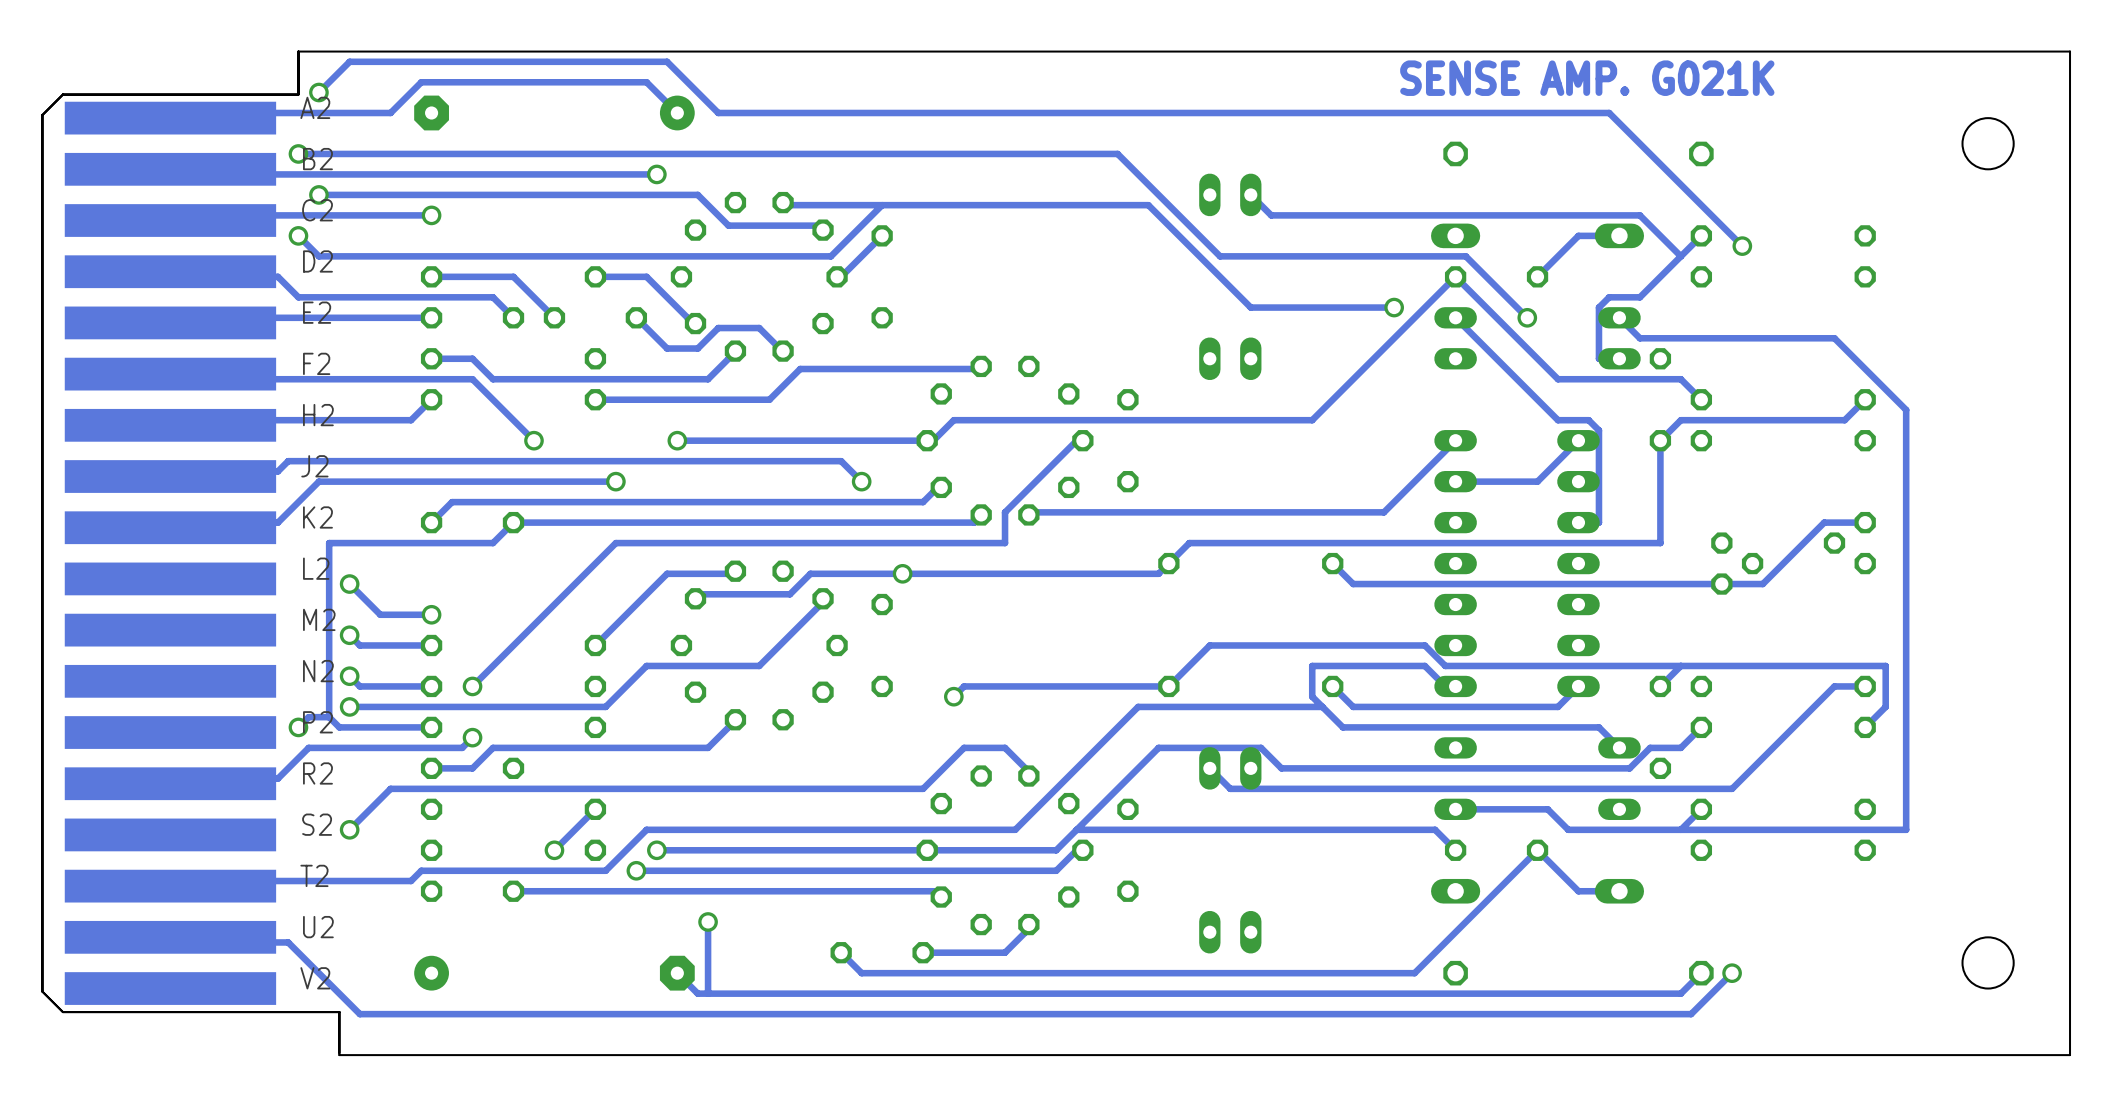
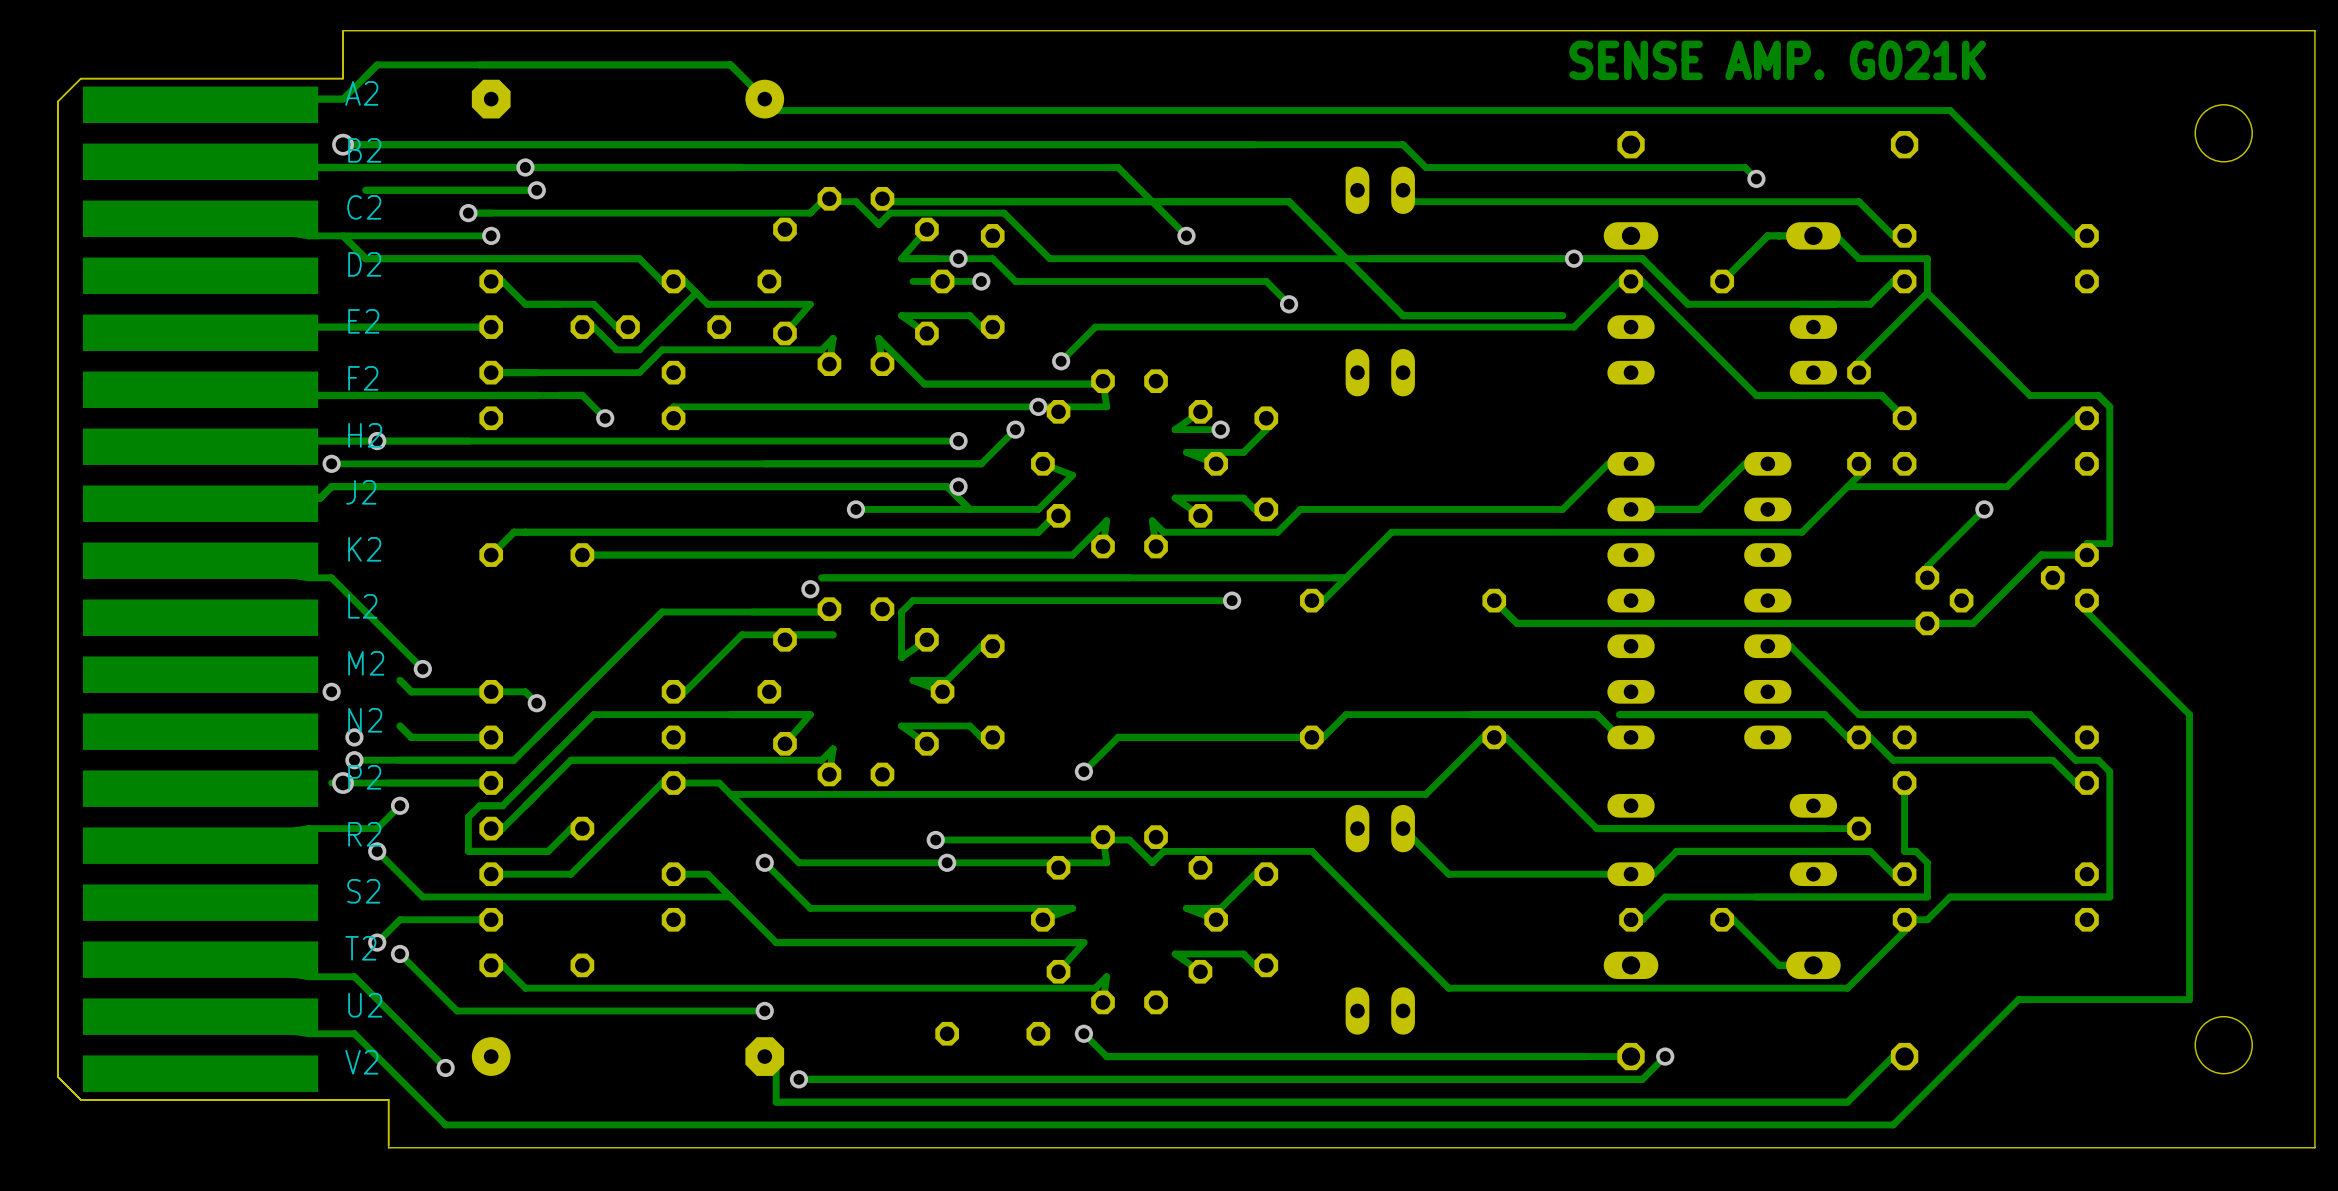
track: (329, 82) (349, 61) (667, 61) (718, 112) (1609, 112) (1742, 246) -> none
track: (421, 82) (390, 112) (298, 112) -> (479, 64) (377, 64)
track: none -> (365, 76) (343, 99)
via: (318, 92) -> none
track: none -> (764, 99) (776, 110) (1950, 110) (2075, 235) (2086, 235)
track: (1117, 153) (1220, 256) -> (1254, 144) (1403, 144) (1425, 167) (1745, 167) (1756, 178)
via: none -> (525, 167)
track: none -> (741, 167) (1118, 167) (1186, 235)
via: (656, 174) -> none
via: none -> (1756, 178)
via: (318, 194) -> none
track: (472, 194) (697, 194) (728, 225) (820, 225) (823, 230) -> (901, 258) (926, 229)
via: none -> (536, 190)
track: (882, 205) (830, 256) -> (1289, 304) (1266, 281) (1015, 281) (992, 258) (935, 258)
track: (1261, 205) (1271, 215) (1639, 215) (1680, 256) -> (1414, 201) (1859, 201) (1893, 235) (1904, 235)
track: (411, 215) (175, 215) (170, 220) -> (491, 235) (308, 235) (200, 218)
via: none -> (468, 213)
track: none -> (491, 213) (810, 213) (821, 201) (855, 201) (878, 224) (890, 213) (1004, 213) (1049, 258) (1368, 258)
via: (431, 215) -> none
via: (298, 235) -> none
via: none -> (491, 235)
track: (882, 235) (841, 276) -> (981, 281) (947, 281)
via: none -> (1186, 235)
track: none -> (1813, 235) (1836, 235) (1859, 258) (1927, 258) (1927, 292)
track: (1701, 235) (1639, 297) -> (1904, 281) (1893, 281) (1870, 304) (1836, 304)
via: (1742, 246) -> none
track: (800, 256) (564, 256) -> (673, 281) (662, 281) (639, 258)
via: none -> (958, 258)
via: none -> (1574, 258)
track: (170, 271) (175, 276) (277, 276) (298, 297) (462, 297) -> none
track: (441, 276) (513, 276) (554, 317) -> (502, 281) (525, 304)
track: (605, 276) (646, 276) (695, 323) -> (684, 281) (707, 304) (810, 304) (784, 333)
track: none -> (942, 281) (912, 281)
via: none -> (981, 281)
track: none -> (696, 292) (639, 349) (616, 349) (593, 327) (582, 327)
track: none -> (1927, 292) (1859, 361) (1859, 372)
track: (493, 297) (513, 317) -> (559, 304) (593, 304) (616, 327) (627, 327)
via: none -> (1289, 304)
track: (1506, 297) (1527, 317) -> (1688, 304) (1802, 304)
track: (1609, 297) (1598, 307) (1598, 358) (1619, 358) -> none
via: (1394, 307) -> none
track: (636, 317) (667, 348) (697, 348) (718, 328) (759, 328) (783, 351) -> (924, 384) (878, 338) (882, 364)
track: none -> (992, 327) (981, 327) (969, 315) (901, 315) (926, 333)
track: (1455, 317) (1558, 420) (1588, 420) (1598, 430) (1598, 522) (1578, 522) -> none
via: (1527, 317) -> none
track: (1619, 317) (1639, 338) (1834, 338) (1875, 379) -> (1927, 292) (2029, 395) (2098, 395)
via: none -> (1061, 361)
track: (735, 351) (708, 379) (513, 379) -> (829, 364) (833, 338) (821, 349) (662, 349) (639, 372) (536, 372)
track: (472, 358) (493, 379) -> (536, 395) (559, 395)
track: (820, 369) (800, 369) (769, 399) (595, 399) -> (1102, 381) (1106, 406) (673, 406) (673, 418)
track: (472, 379) (533, 440) -> none
track: none -> (582, 395) (605, 418)
track: (1568, 379) (1558, 379) (1455, 276) (1312, 420) (953, 420) (933, 440) (871, 440) -> (1756, 395) (1642, 281) (1619, 281) (1574, 327) (1095, 327) (1061, 361)
via: none -> (1038, 406)
track: (1885, 389) (1906, 409) (1906, 829) (1885, 829) -> (2109, 406) (2109, 543) (2086, 543) (2086, 555)
track: none -> (1200, 411) (1175, 429) (1220, 429)
track: (431, 399) (411, 420) -> (958, 441) (468, 441)
via: none -> (605, 418)
track: none -> (1266, 418) (1266, 429) (1243, 452) (1186, 452) (1216, 463)
track: (1865, 399) (1844, 420) (1680, 420) (1660, 440) -> (2086, 418) (2075, 418) (2007, 486) (1847, 486)
track: none -> (1015, 429) (981, 463)
via: none -> (1015, 429)
via: none -> (1220, 429)
via: none -> (377, 441)
via: none -> (958, 441)
via: none -> (331, 463)
via: (533, 440) -> none
track: none -> (764, 463) (331, 463)
via: (677, 440) -> none
track: none -> (1042, 463) (1072, 475) (1038, 509) (855, 509)
track: (1082, 440) (1076, 440) (1005, 512) (1005, 543) -> (1334, 577) (1129, 577)
track: (1455, 440) (1383, 512) (1035, 512) (1028, 514) -> (1631, 463) (1608, 463) (1562, 509) (1300, 509) (1277, 532) (1163, 532) (1152, 520) (1156, 546)
track: (1578, 440) (1537, 481) (1517, 481) -> (1767, 463) (1745, 463) (1699, 509)
track: (1660, 450) (1660, 543) (1199, 543) -> (1859, 475) (1802, 532) (1391, 532) (1323, 600) (1311, 600)
via: none -> (958, 486)
track: (615, 481) (318, 481) (277, 522) (175, 522) (170, 527) -> (422, 669) (331, 577) (308, 577) (200, 560)
via: (615, 481) -> none
via: none -> (855, 509)
via: (861, 481) -> none
track: none -> (1266, 509) (1254, 509) (1243, 498) (1175, 498) (1200, 515)
track: none -> (1984, 509) (1927, 566) (1927, 577)
via: none -> (1984, 509)
track: (981, 514) (974, 522) (953, 522) -> (1102, 546) (1106, 520) (1072, 555)
track: (513, 522) (493, 543) (329, 543) (329, 717) -> none
track: (728, 543) (615, 543) (585, 573) -> (753, 612) (662, 612)
track: (1189, 543) (1158, 573) (810, 573) (789, 594) (738, 594) -> none
via: none -> (810, 589)
track: none -> (1232, 600) (912, 600) (901, 612) (901, 657) (926, 639)
via: none -> (1232, 600)
track: (667, 573) (595, 645) -> (787, 634) (741, 634) (684, 691) (673, 691)
via: (902, 573) -> none
track: (349, 584) (380, 614) (431, 614) -> none
via: (349, 584) -> none
track: (823, 598) (820, 604) (759, 665) (718, 665) -> (784, 743) (810, 714)
track: none -> (992, 646) (981, 646) (947, 680) (912, 680) (942, 691)
via: (431, 614) -> none
via: none -> (422, 669)
via: (349, 635) -> none
via: none -> (331, 691)
track: none -> (491, 691) (525, 691) (536, 703)
via: none -> (536, 703)
track: (646, 665) (605, 706) -> (829, 774) (833, 748) (821, 760) (684, 760)
track: none -> (730, 714) (593, 714) (502, 805)
track: (1312, 665) (1312, 696) (1342, 727) (1598, 727) (1619, 747) -> none
track: (1445, 665) (1424, 645) (1209, 645) (1168, 686) -> (1471, 714) (1346, 714) (1323, 737) (1311, 737)
track: none -> (1824, 714) (1847, 737) (1870, 737) (1893, 760) (2052, 760) (2075, 783) (2086, 783)
track: (1660, 665) (1629, 665) -> (1859, 714) (1790, 646) (1767, 646)
track: (1680, 665) (1660, 686) -> none
track: (1814, 665) (1885, 665) (1885, 706) (1865, 727) -> (2029, 714) (2075, 760) (2098, 760) (2109, 771) (2109, 896)
via: (349, 676) -> none
via: none -> (354, 737)
track: none -> (536, 737) (514, 760)
via: (472, 686) -> none
track: none -> (992, 737) (981, 737) (969, 726) (901, 726) (926, 743)
track: (994, 686) (964, 686) (953, 696) -> (1118, 737) (1083, 771)
track: (1578, 686) (1558, 706) (1353, 706) (1332, 686) -> none
track: (1865, 686) (1834, 686) (1732, 788) (1711, 788) -> none
via: (953, 696) -> none
via: none -> (354, 760)
track: none -> (400, 760) (354, 760)
via: (349, 706) -> none
track: (503, 706) (452, 706) -> (570, 760) (536, 794)
track: (1322, 706) (1138, 706) (1015, 829) (646, 829) (605, 870) (421, 870) (411, 881) (175, 881) (170, 886) -> (445, 1067) (354, 976) (308, 976) (200, 959)
track: (329, 717) (339, 727) -> (331, 783) (388, 783)
track: (329, 717) (308, 717) (298, 727) -> none
via: none -> (1083, 771)
track: (735, 719) (708, 747) (493, 747) (472, 768) (441, 768) -> none
track: (1701, 727) (1680, 747) (1650, 747) (1629, 768) -> (1859, 828) (1824, 828)
track: none -> (1904, 783) (1904, 851)
via: (472, 737) -> none
via: none -> (400, 805)
track: (421, 747) (308, 747) (277, 778) (175, 778) (170, 783) -> (400, 805) (377, 828) (308, 828) (200, 845)
track: (462, 747) (441, 747) -> (525, 805) (502, 828)
track: (1209, 768) (1230, 788) (1496, 788) -> (1653, 874) (1676, 851)
track: none -> (1403, 828) (1448, 874) (1631, 874)
track: (1424, 768) (1281, 768) (1261, 747) (1158, 747) (1056, 850) (656, 850) -> (1596, 828) (1505, 737) (1482, 737) (1425, 794) (730, 794)
track: none -> (1102, 837) (1106, 862) (798, 862) (719, 783) (662, 783) (570, 874) (491, 874)
track: (1028, 776) (1025, 768) (1005, 747) (964, 747) (923, 788) (482, 788) -> (582, 828) (570, 828) (548, 851)
track: none -> (935, 839) (1129, 839) (1152, 862) (1163, 851) (1311, 851) (1448, 988) (1847, 988) (1904, 931) (1904, 919) (1927, 919) (1950, 896)
via: none -> (935, 839)
track: none -> (377, 851) (422, 896) (730, 896)
via: none -> (377, 851)
track: (411, 788) (390, 788) (349, 829) -> (468, 851) (468, 817) (479, 805)
track: (1701, 788) (1670, 788) -> (1904, 874) (1893, 874) (1870, 851)
track: none -> (764, 862) (810, 908) (1072, 908) (1042, 919)
via: none -> (764, 862)
via: none -> (947, 862)
track: (595, 809) (554, 850) -> none
track: none -> (1266, 874) (1254, 874) (1220, 908) (1186, 908) (1216, 919)
track: (1476, 809) (1547, 809) (1568, 829) -> (1631, 919) (1642, 919) (1665, 896) (1756, 896)
track: (1701, 809) (1680, 829) -> none
via: (349, 829) -> none
track: (1076, 829) (1435, 829) (1455, 850) -> none
track: (1742, 829) (1721, 829) -> (1915, 851) (1927, 862) (1927, 896)
track: none -> (491, 919) (400, 919) (377, 942)
via: (554, 850) -> none
via: (656, 850) -> none
track: (1082, 850) (1076, 850) (1056, 870) (964, 870) -> (1058, 971) (1083, 942)
track: none -> (1722, 919) (1733, 919) (1779, 965)
via: none -> (377, 942)
via: (636, 870) -> none
track: (687, 870) (636, 870) -> (776, 942) (707, 874) (673, 874)
track: none -> (400, 953) (457, 1010) (764, 1010)
via: none -> (400, 953)
track: none -> (491, 965) (502, 965) (525, 988) (1095, 988) (1106, 976) (1102, 1002)
track: (513, 891) (933, 891) (941, 897) -> none
track: none -> (1266, 965) (1254, 965) (1243, 953) (1175, 953) (1200, 971)
track: (1588, 891) (1578, 891) (1537, 850) (1414, 973) -> (1631, 1056) (1585, 1056)
track: (708, 921) (708, 993) (697, 993) (687, 983) -> (776, 1102) (776, 1067)
via: (708, 921) -> none
track: (1028, 924) (1025, 932) (1005, 952) (923, 952) -> none
via: none -> (764, 1010)
track: (170, 937) (175, 942) (288, 942) (359, 1014) (687, 1014) -> (200, 1016) (308, 1033) (354, 1033) (445, 1124) (1893, 1124) (2018, 999) (2189, 999) (2189, 714) (2086, 612) (2086, 600)
track: (841, 952) (861, 973) (984, 973) -> (1083, 1033) (1106, 1056)
via: none -> (1083, 1033)
via: none -> (1665, 1056)
track: (1701, 973) (1680, 993) (1465, 993) -> (1665, 1056) (1642, 1079)
track: (1732, 973) (1691, 1014) (1650, 1014) -> (1904, 1056) (1893, 1056) (1847, 1102)
via: (1732, 973) -> none
via: none -> (445, 1067)
via: none -> (798, 1079)

